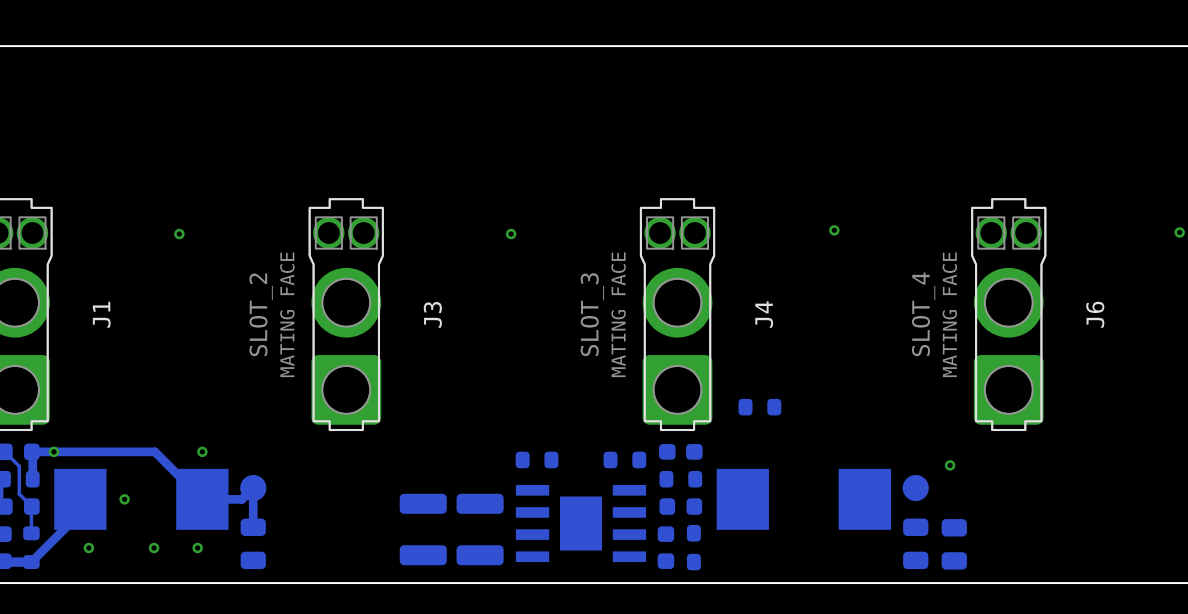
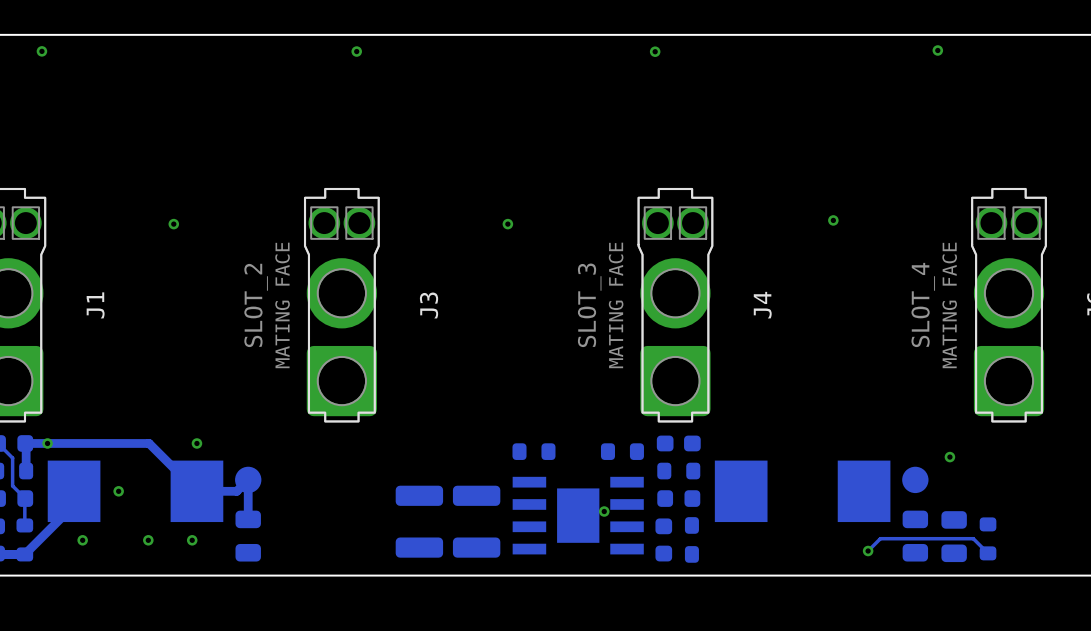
via: none -> (937, 50)
via: none -> (41, 51)
via: none -> (356, 51)
via: none -> (655, 51)
part rotation: 0° (759, 407) -> 90° clockwise (988, 538)
part position: (759, 407) -> (988, 538)
via: none -> (604, 511)
bottom track: none -> (868, 551) (880, 538) (973, 538) (988, 553)
via: none -> (868, 551)

